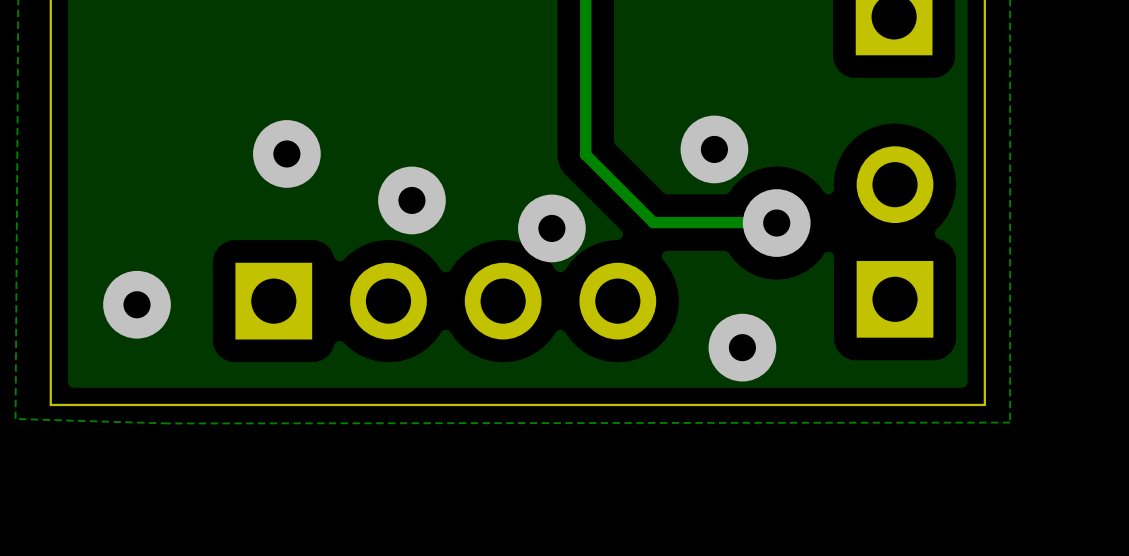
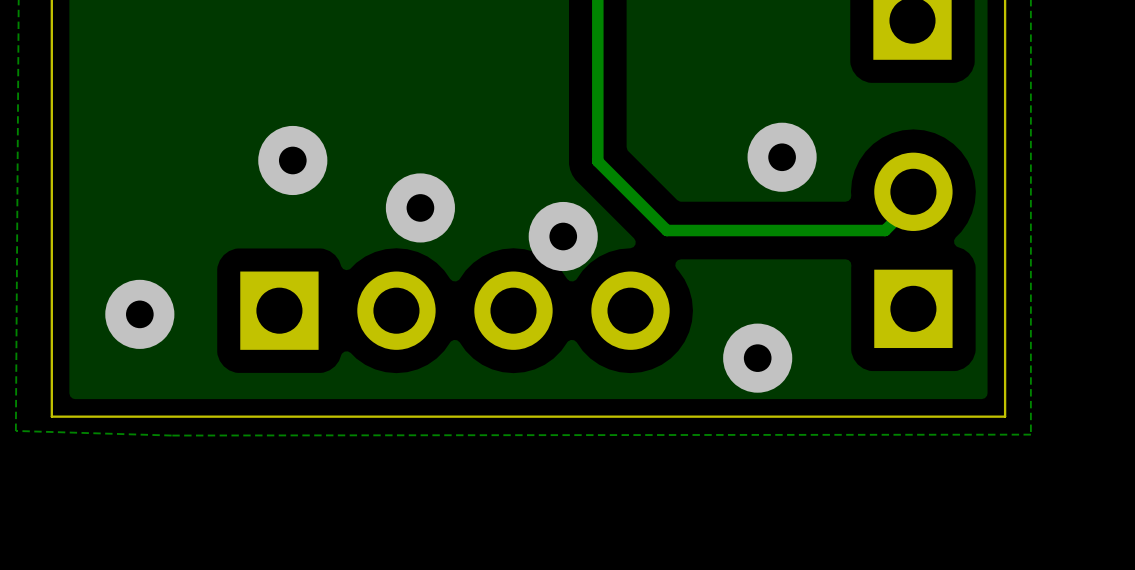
via: (714, 149) -> none
via: none -> (782, 157)
track: none -> (920, 195) (885, 230) (792, 230)
via: (776, 223) -> none

